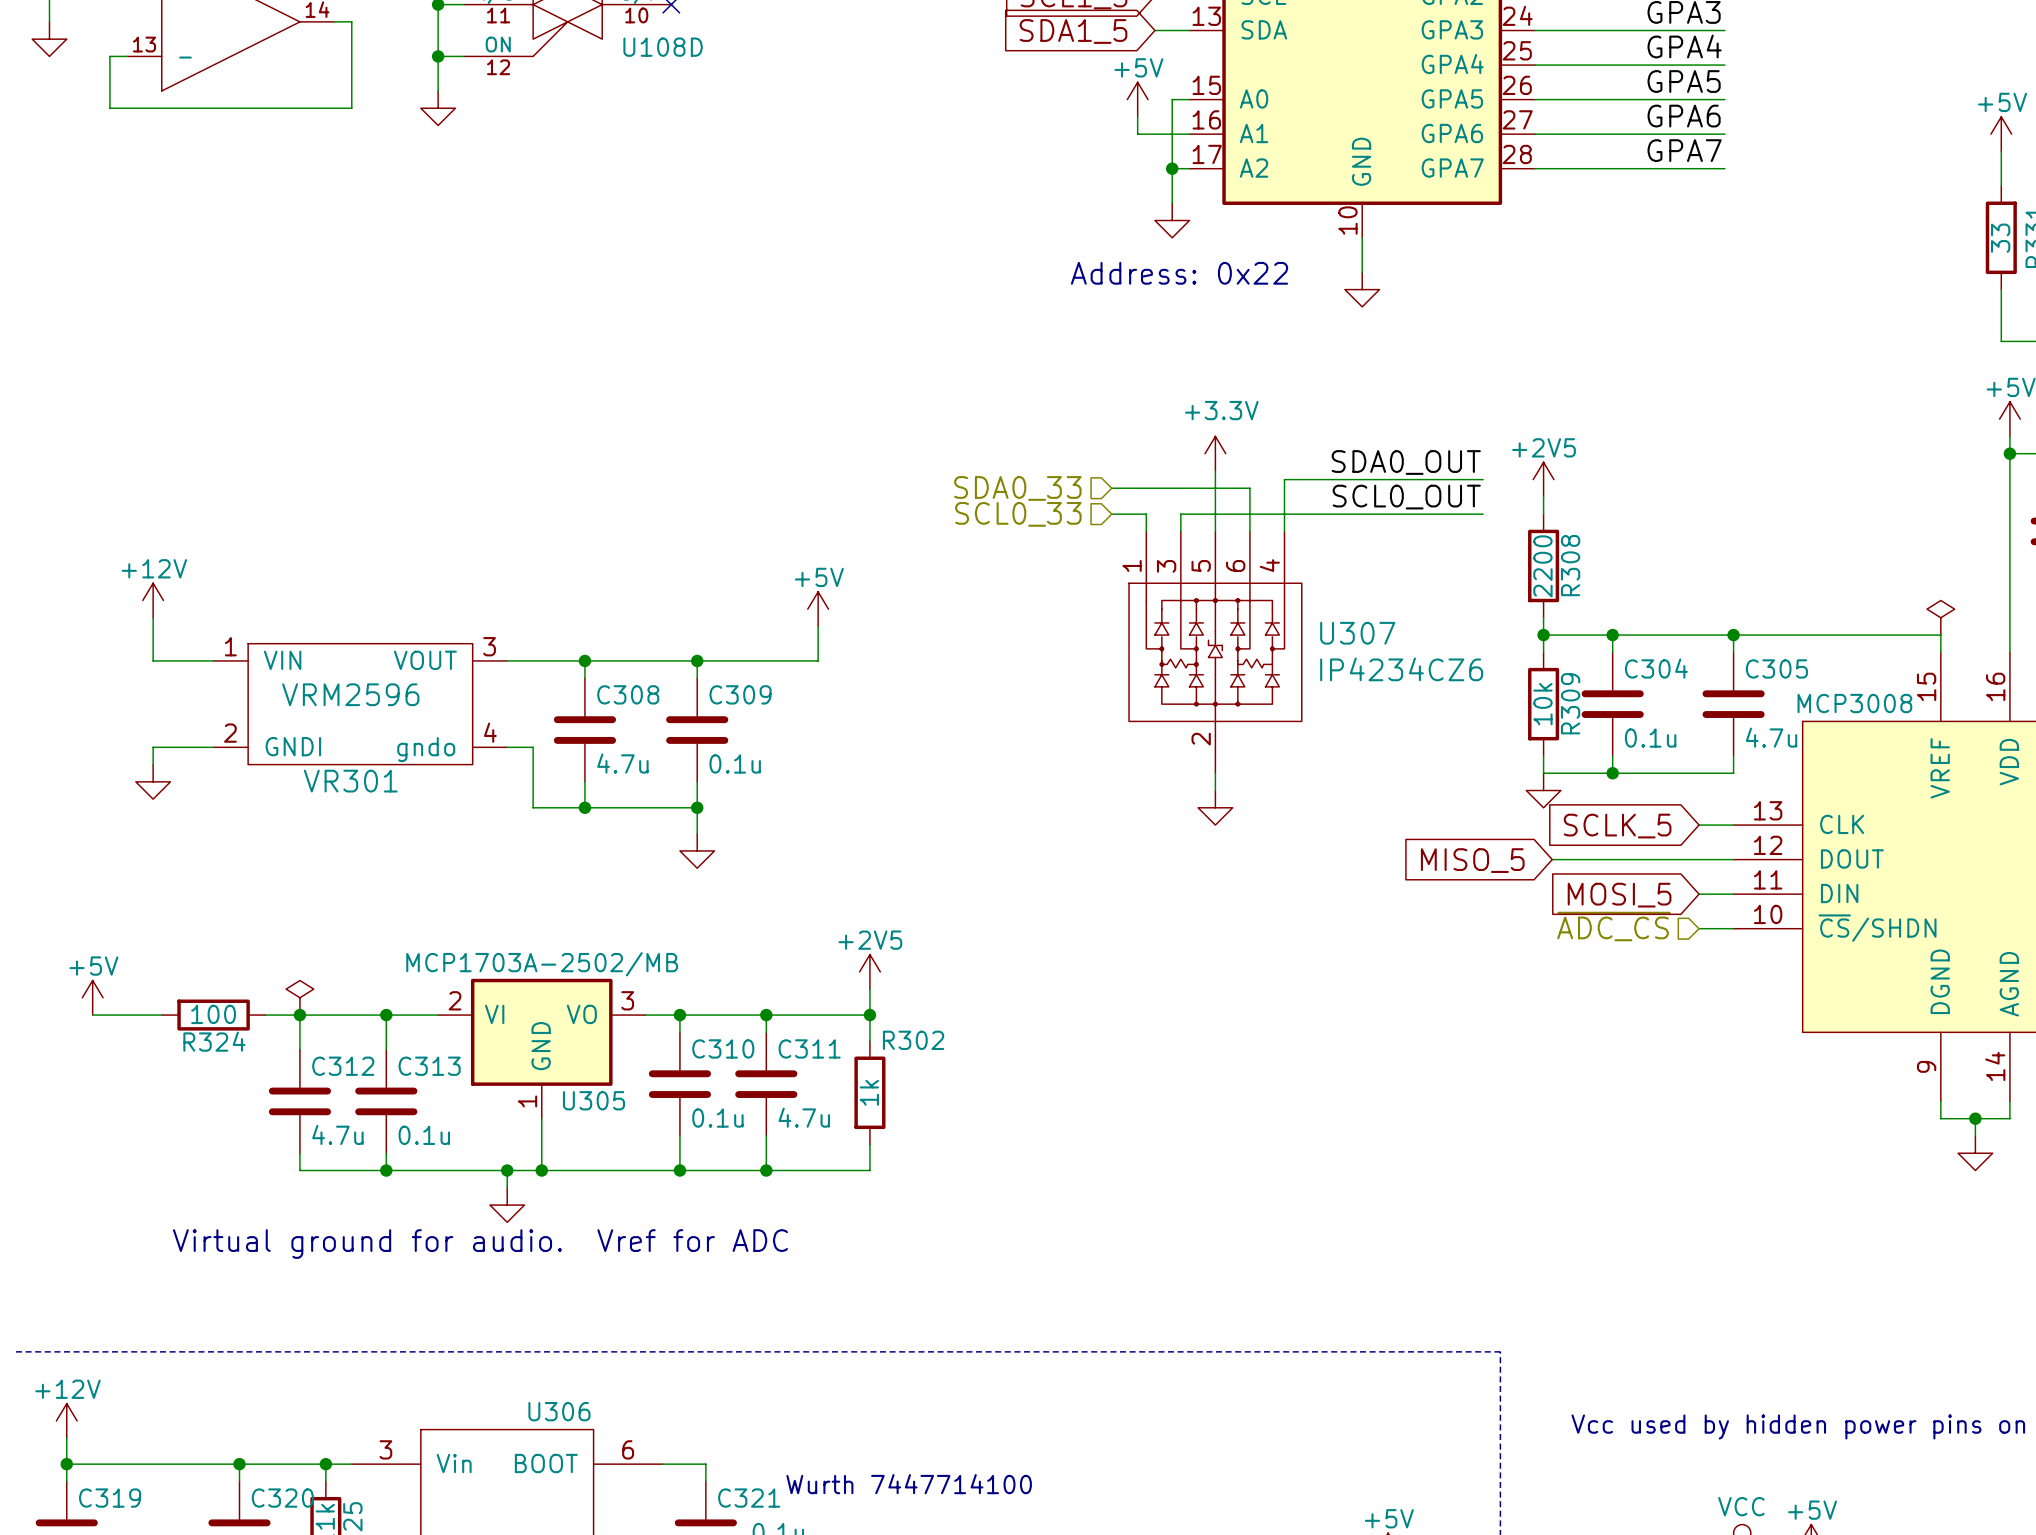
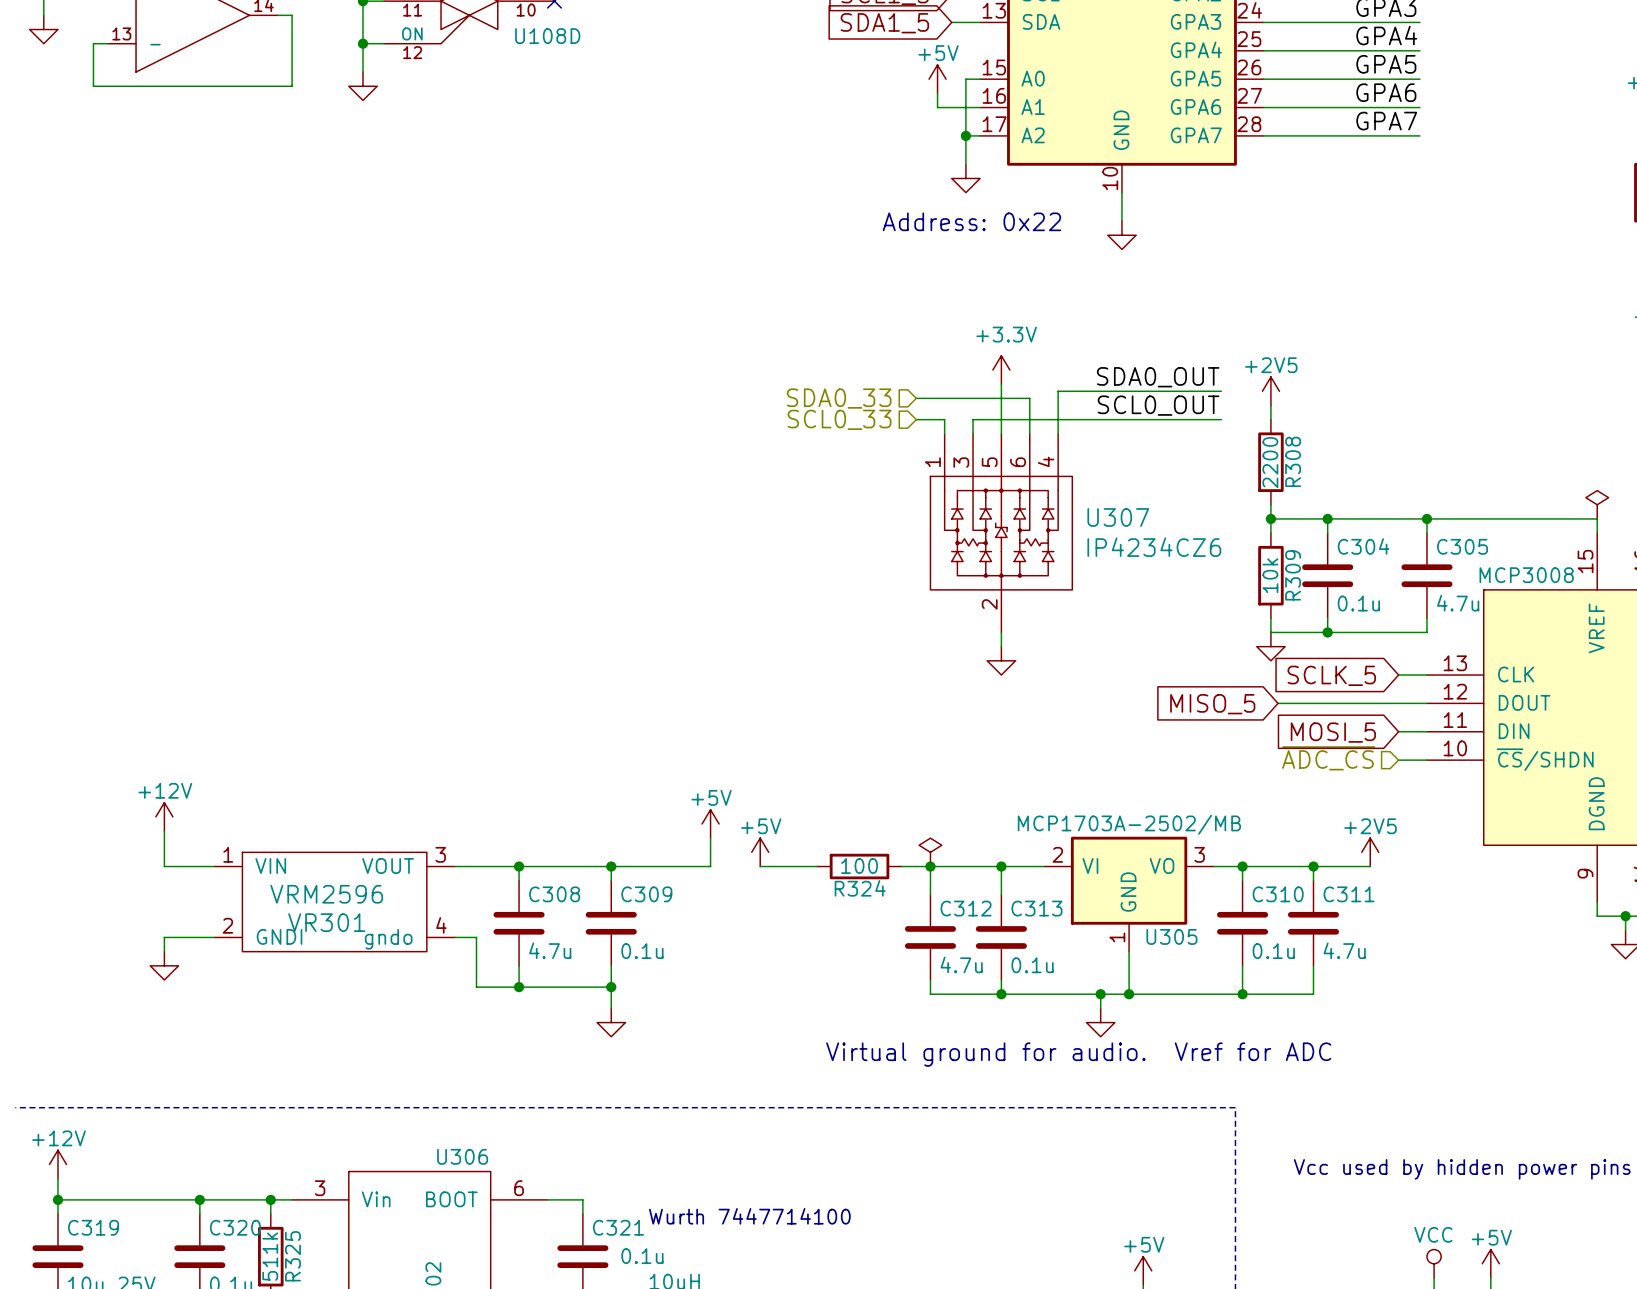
power symbol: +12V (153, 600) -> none
power symbol: +5V (818, 609) -> none
wire: (153, 617) (153, 660) (213, 660) -> none
wire: (818, 626) (818, 660) (507, 660) -> none
wire: (584, 660) (584, 678) -> none
junction: (584, 660) -> none
wire: (697, 660) (697, 678) -> none
junction: (697, 660) -> none
VR301 position: (360, 704) -> (334, 901)
C308 position: (584, 730) -> (519, 923)
C309 position: (697, 730) -> (611, 923)
wire: (213, 747) (153, 747) (153, 764) -> none
wire: (507, 747) (533, 747) (533, 807) (697, 807) -> none
power symbol: (153, 781) -> none
VR301 name position: VR301 (350, 781) -> VR301 (326, 922)
wire: (584, 781) (584, 807) -> none
wire: (697, 781) (697, 833) -> none
junction: (584, 807) -> none
junction: (697, 807) -> none
power symbol: (697, 850) -> none
power symbol: +2V5 (869, 971) -> none
wire: (869, 989) (869, 1040) -> none
power symbol: +5V (92, 997) -> none
power symbol: none -> +12V (164, 816)
power symbol: (299, 997) -> none
power symbol: none -> +5V (710, 823)
wire: (92, 1015) (161, 1015) -> none
wire: none -> (164, 831) (164, 866) (214, 866)
R324 position: (213, 1015) -> (859, 866)
wire: (265, 1015) (438, 1015) -> none
wire: (299, 1015) (299, 1049) -> none
junction: (299, 1015) -> none
wire: (386, 1015) (386, 1049) -> none
junction: (386, 1015) -> none
wire: (645, 1015) (869, 1015) -> none
wire: (679, 1015) (679, 1032) -> (519, 866) (519, 880)
junction: (679, 1015) -> none
wire: (766, 1015) (766, 1032) -> (611, 866) (611, 880)
junction: (766, 1015) -> none
junction: (869, 1015) -> none
wire: none -> (710, 838) (710, 866) (455, 866)
power symbol: none -> +5V (760, 852)
power symbol: none -> (930, 852)
power symbol: none -> +2V5 (1370, 852)
U305 position: (541, 1048) -> (1129, 894)
junction: none -> (519, 866)
junction: none -> (611, 866)
wire: none -> (760, 866) (816, 866)
wire: none -> (902, 866) (1043, 866)
wire: none -> (930, 866) (930, 894)
junction: none -> (930, 866)
wire: none -> (1001, 866) (1001, 894)
junction: none -> (1001, 866)
wire: none -> (1214, 866) (1370, 866)
wire: none -> (1242, 866) (1242, 880)
junction: none -> (1242, 866)
wire: none -> (1313, 866) (1313, 880)
junction: none -> (1313, 866)
C310 position: (679, 1084) -> (1242, 923)
C311 position: (766, 1084) -> (1313, 923)
R302: 1k (869, 1092) -> none
C312 position: (299, 1101) -> (930, 937)
C313 position: (386, 1101) -> (1001, 937)
wire: (541, 1118) (541, 1170) -> (611, 965) (611, 1008)
wire: (679, 1135) (679, 1170) -> none
wire: (766, 1135) (766, 1170) -> none
wire: none -> (214, 937) (164, 937) (164, 951)
wire: none -> (455, 937) (476, 937) (476, 987) (611, 987)
wire: (869, 1144) (869, 1170) (299, 1170) (299, 1153) -> none
wire: (386, 1153) (386, 1170) -> none
wire: none -> (1129, 951) (1129, 994)
junction: (386, 1170) -> none
wire: (507, 1170) (507, 1187) -> none
junction: (507, 1170) -> none
junction: (541, 1170) -> none
junction: (679, 1170) -> none
junction: (766, 1170) -> none
power symbol: none -> (164, 965)
wire: none -> (519, 965) (519, 987)
wire: none -> (1242, 965) (1242, 994)
wire: none -> (1313, 965) (1313, 994) (930, 994) (930, 980)
wire: none -> (1001, 980) (1001, 994)
power symbol: (507, 1205) -> none
junction: none -> (519, 987)
junction: none -> (611, 987)
junction: none -> (1001, 994)
wire: none -> (1100, 994) (1100, 1008)
junction: none -> (1100, 994)
junction: none -> (1129, 994)
junction: none -> (1242, 994)
text: Virtual ground for audio. Vref for ADC (480, 1244) -> none
power symbol: none -> (611, 1022)
power symbol: none -> (1100, 1022)
text: none -> Virtual ground for audio. Vref for ADC (1078, 1054)

